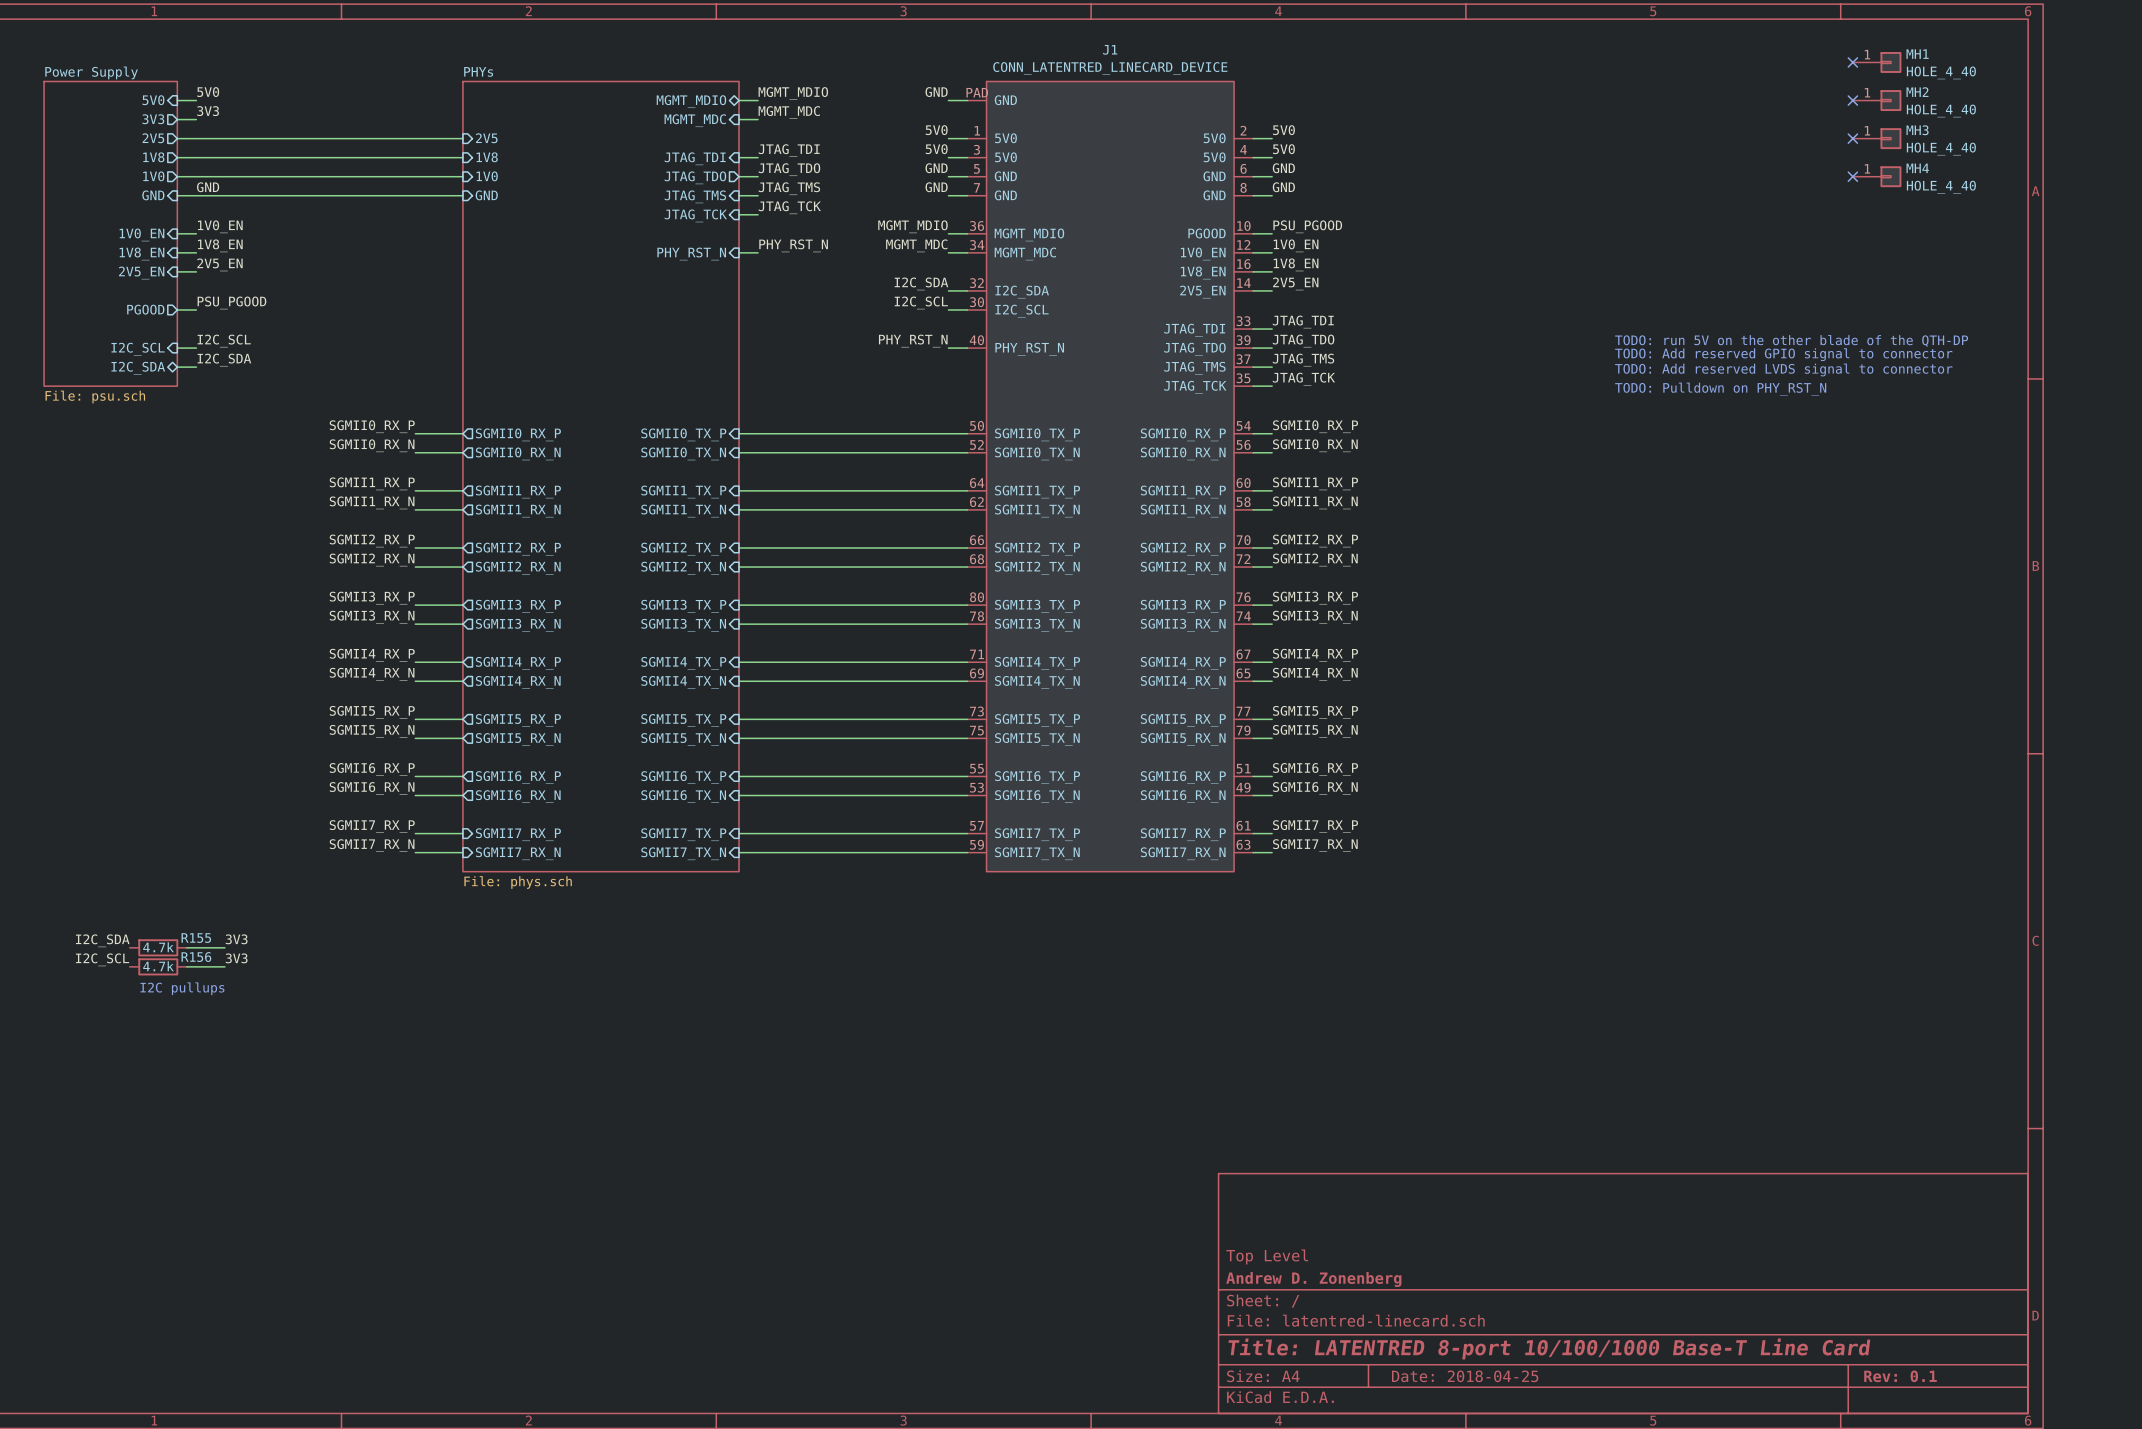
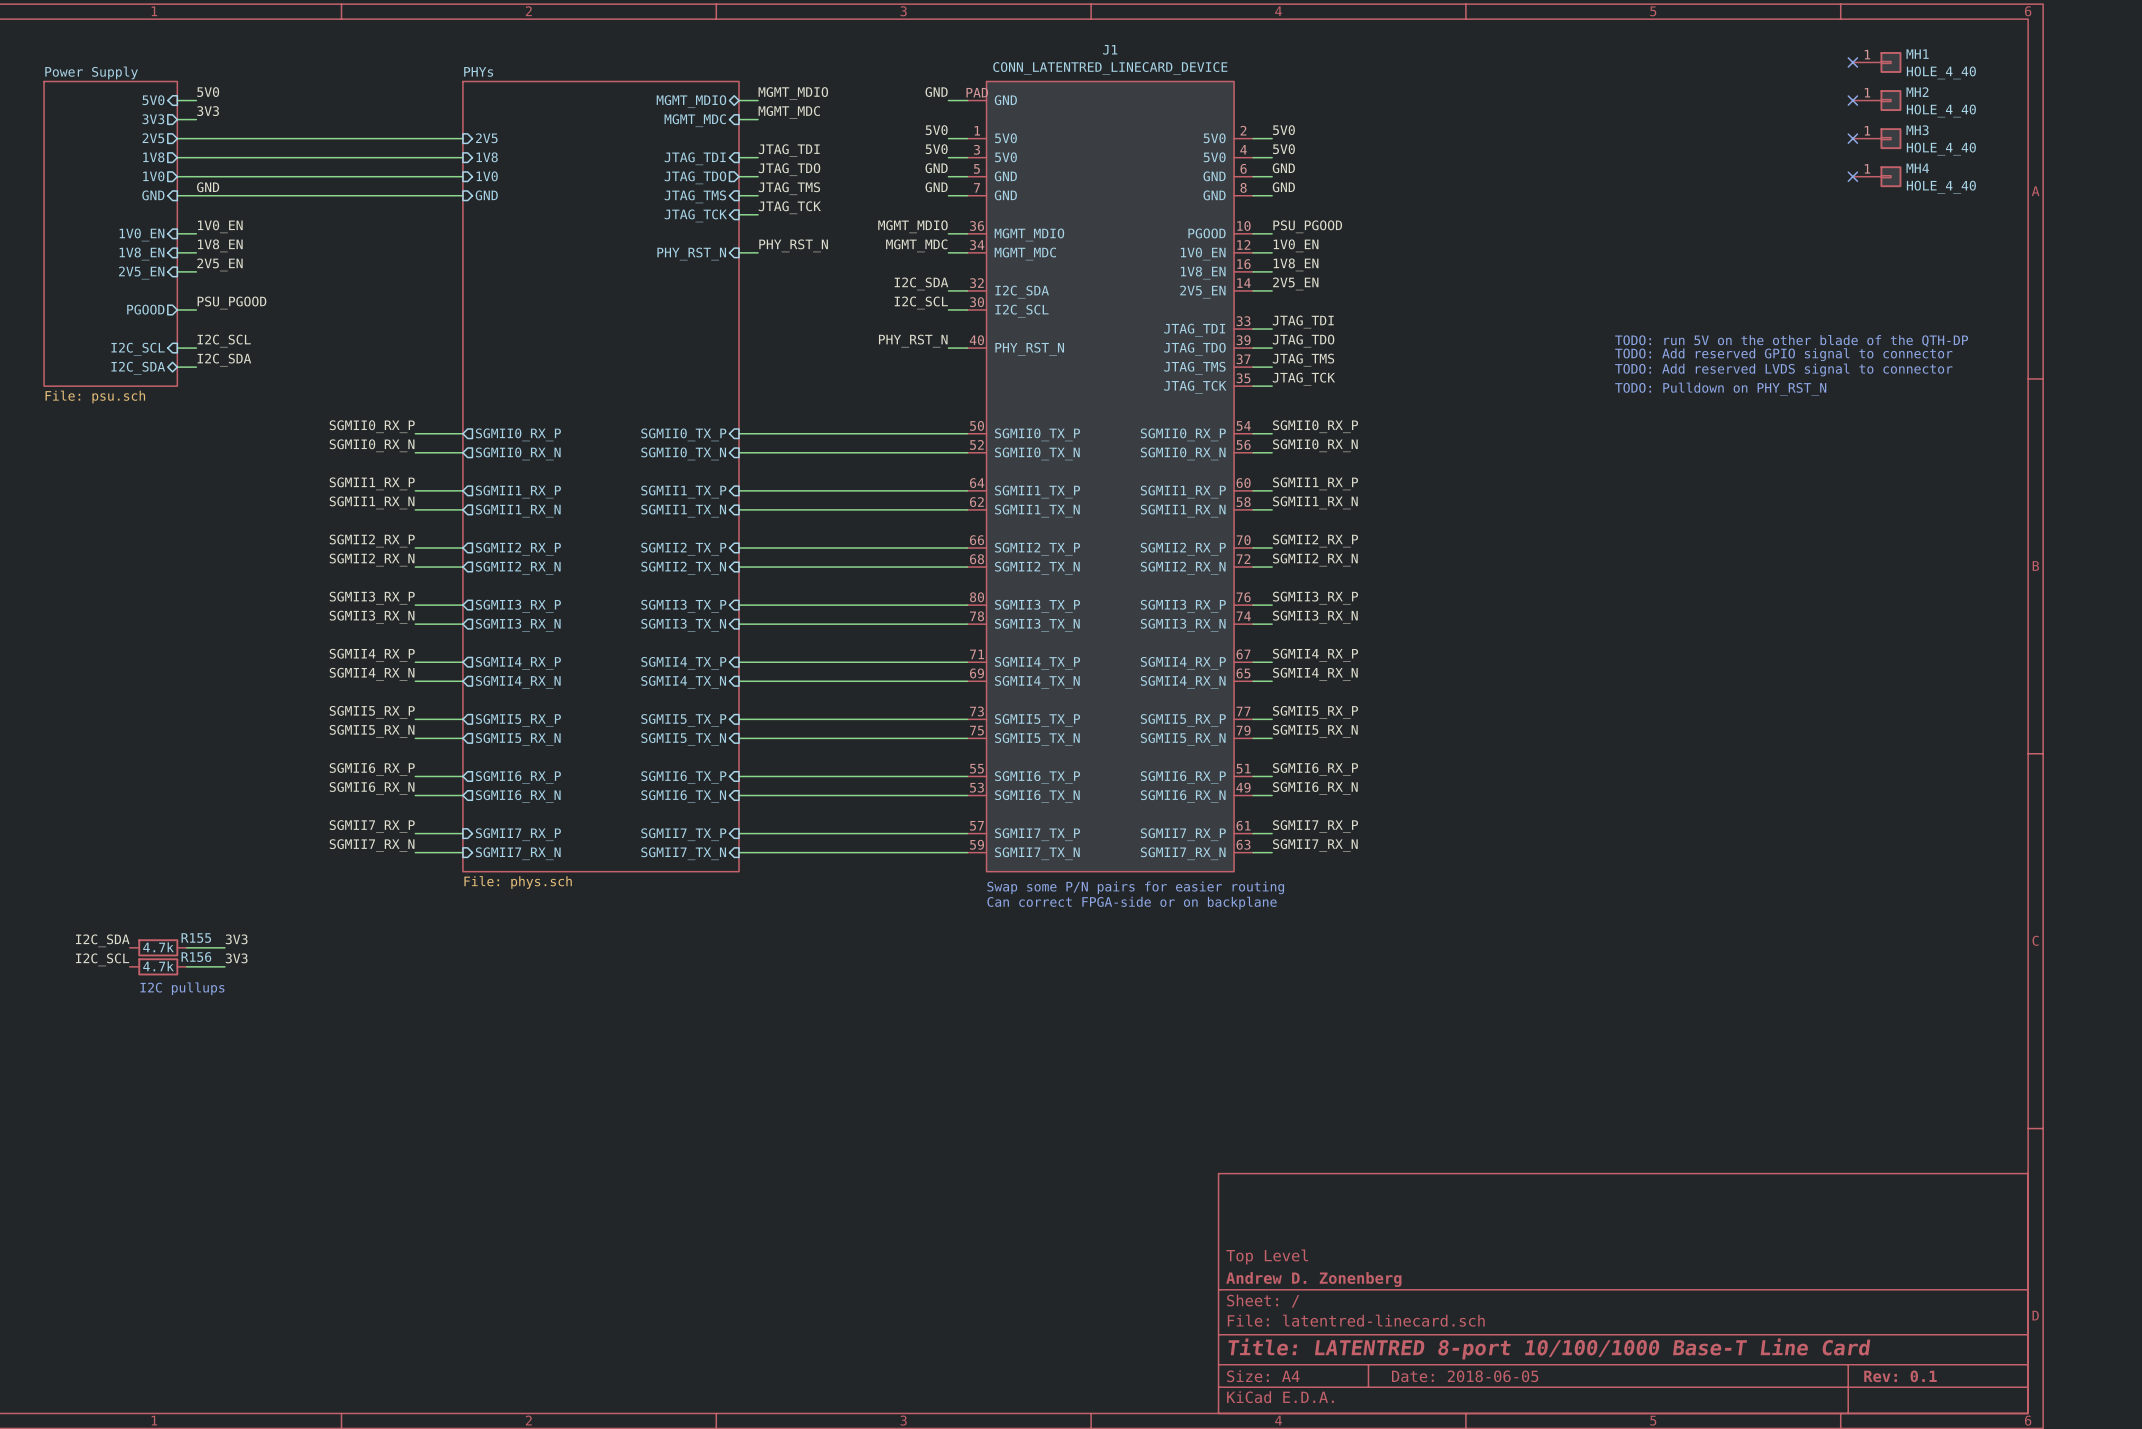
text: none -> Swap some P/N pairs for easier routing (1135, 887)
text: none -> Can correct FPGA-side or on backplane (1132, 903)
title block: Date: 2018-04-25 (1465, 1376) -> Date: 2018-06-05 (1465, 1376)

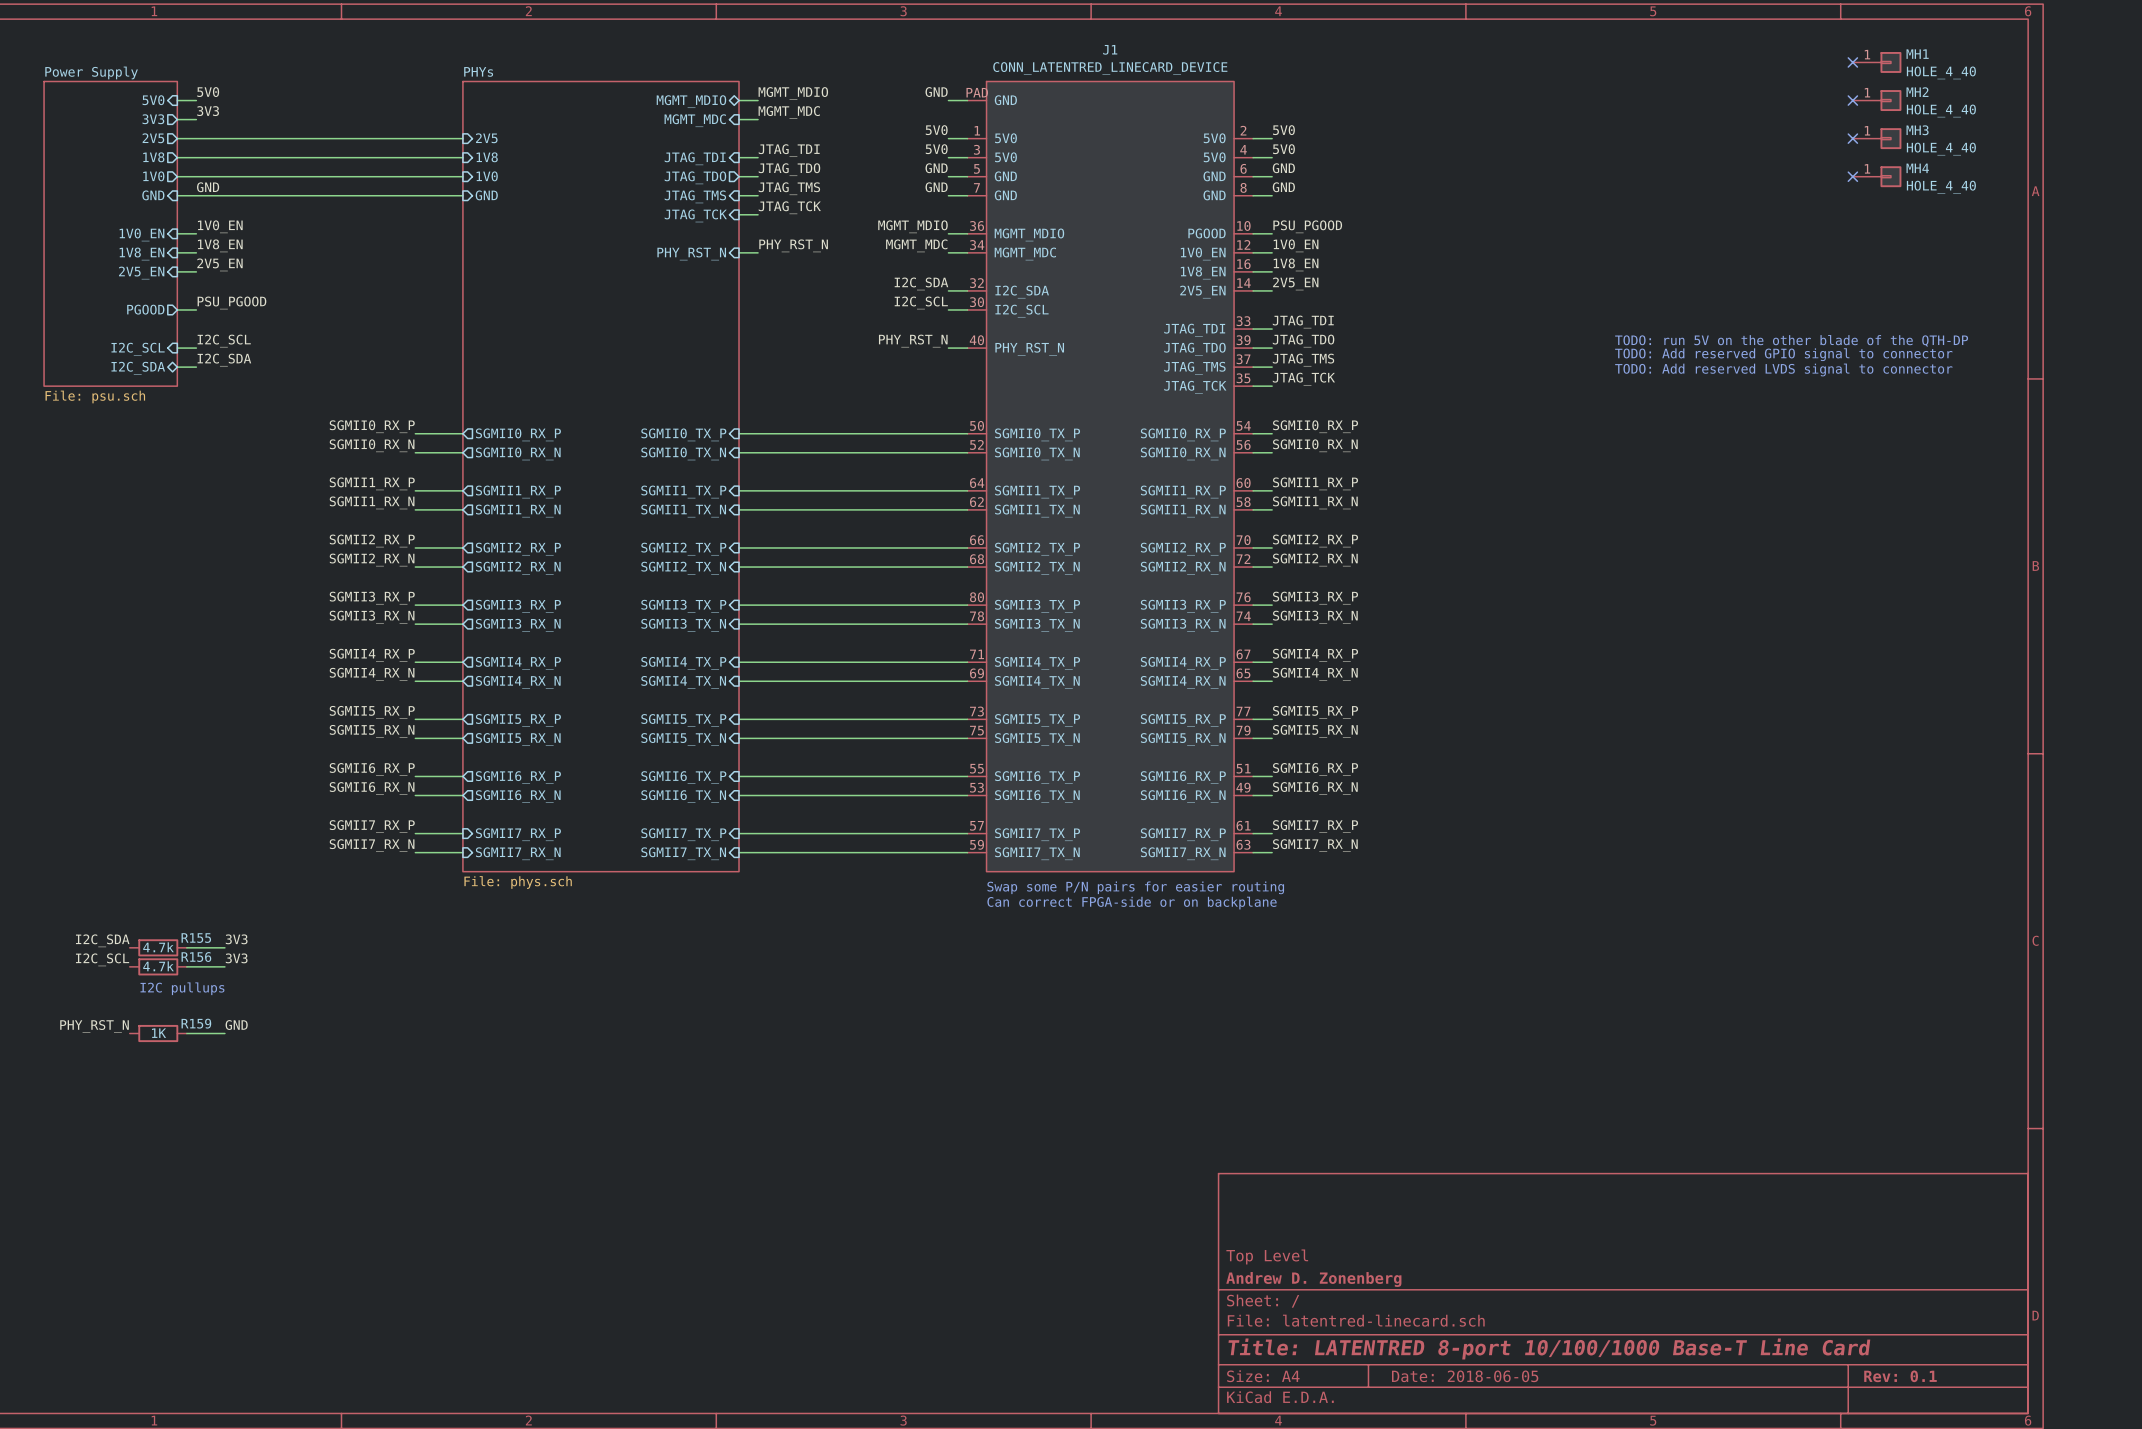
text: TODO: Pulldown on PHY_RST_N (1720, 389) -> none
label: none -> GND (236, 1025)
label: none -> PHY_RST_N (94, 1026)
R159: none -> 1K (158, 1033)
wire: none -> (186, 1033) (224, 1033)

